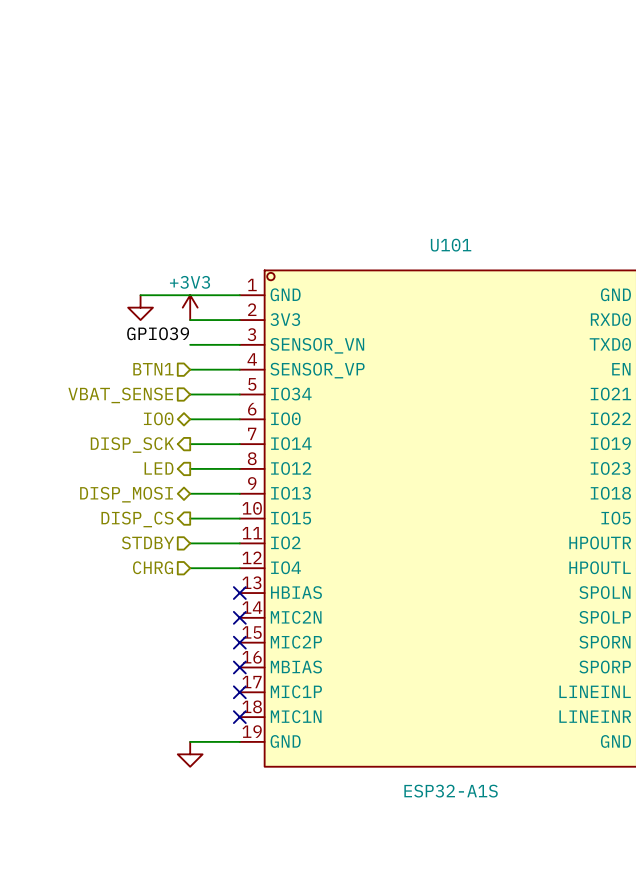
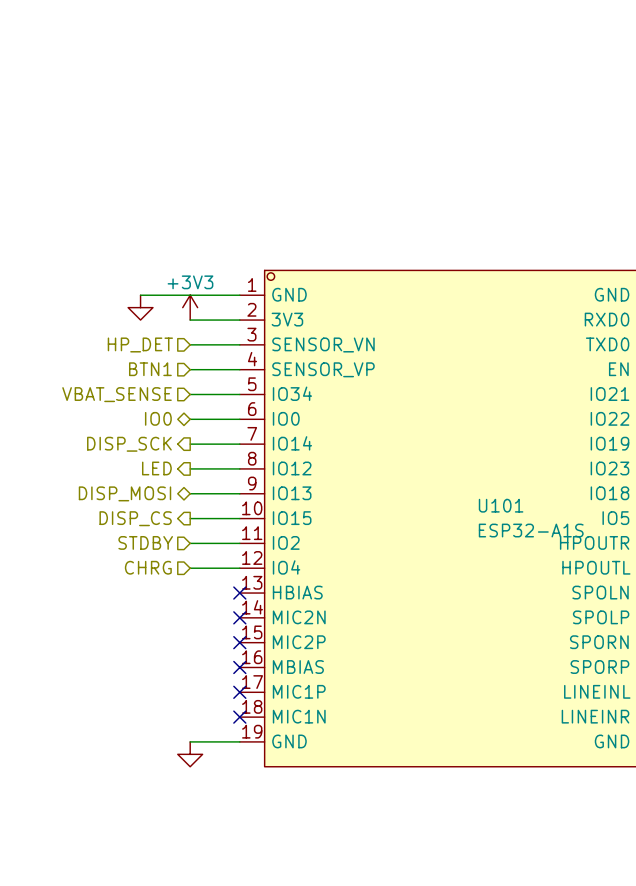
U101 name position: U101 (451, 245) -> U101 (501, 505)
label: GPIO39 (158, 333) -> none
hierarchical label: none -> HP_DET (140, 344)
U101 value position: ESP32-A1S (451, 791) -> ESP32-A1S (531, 530)

